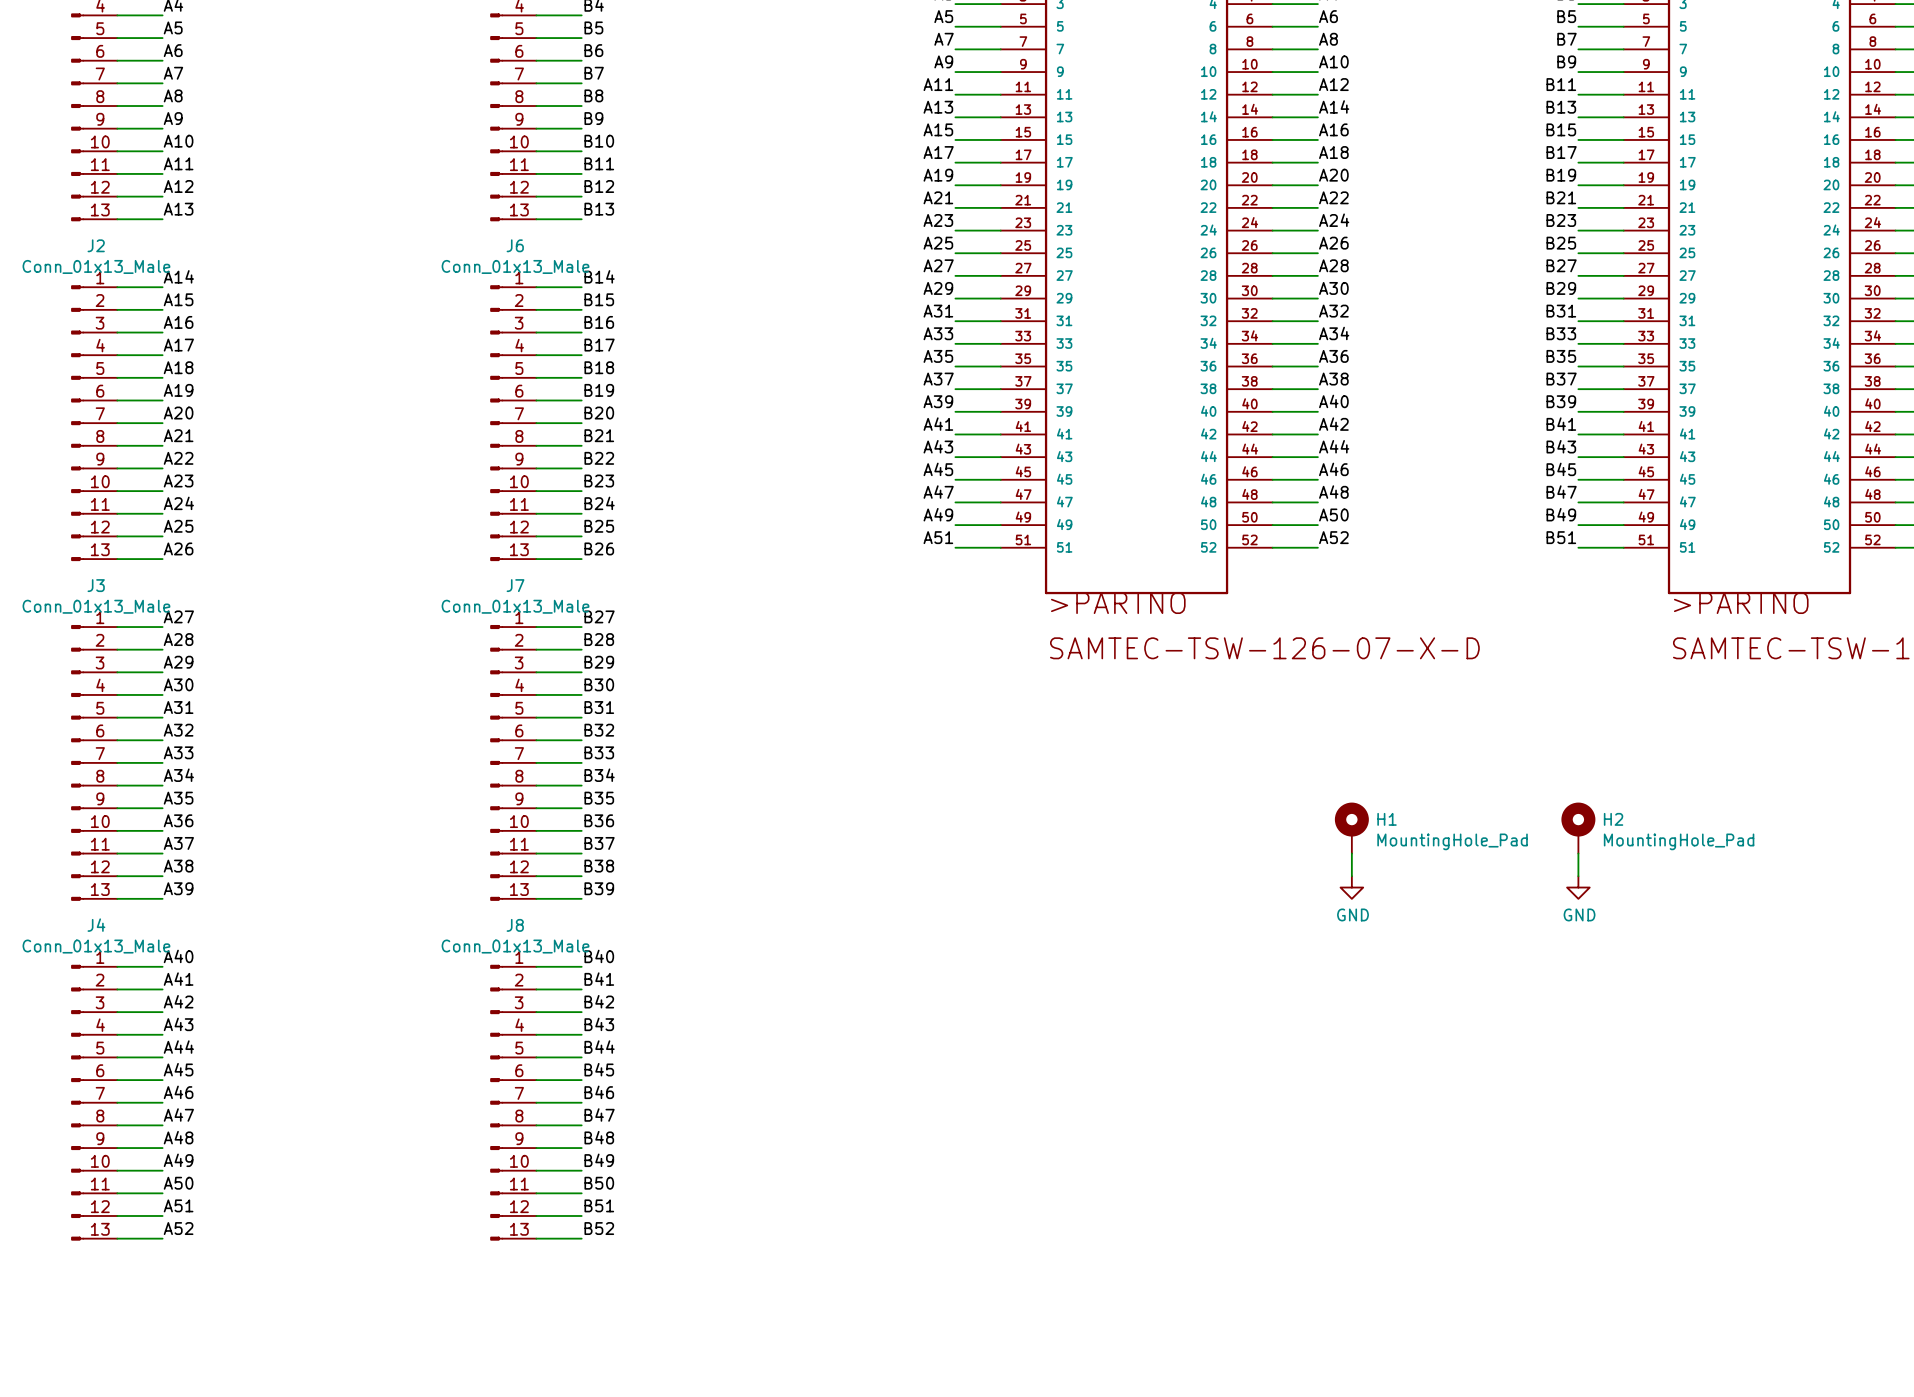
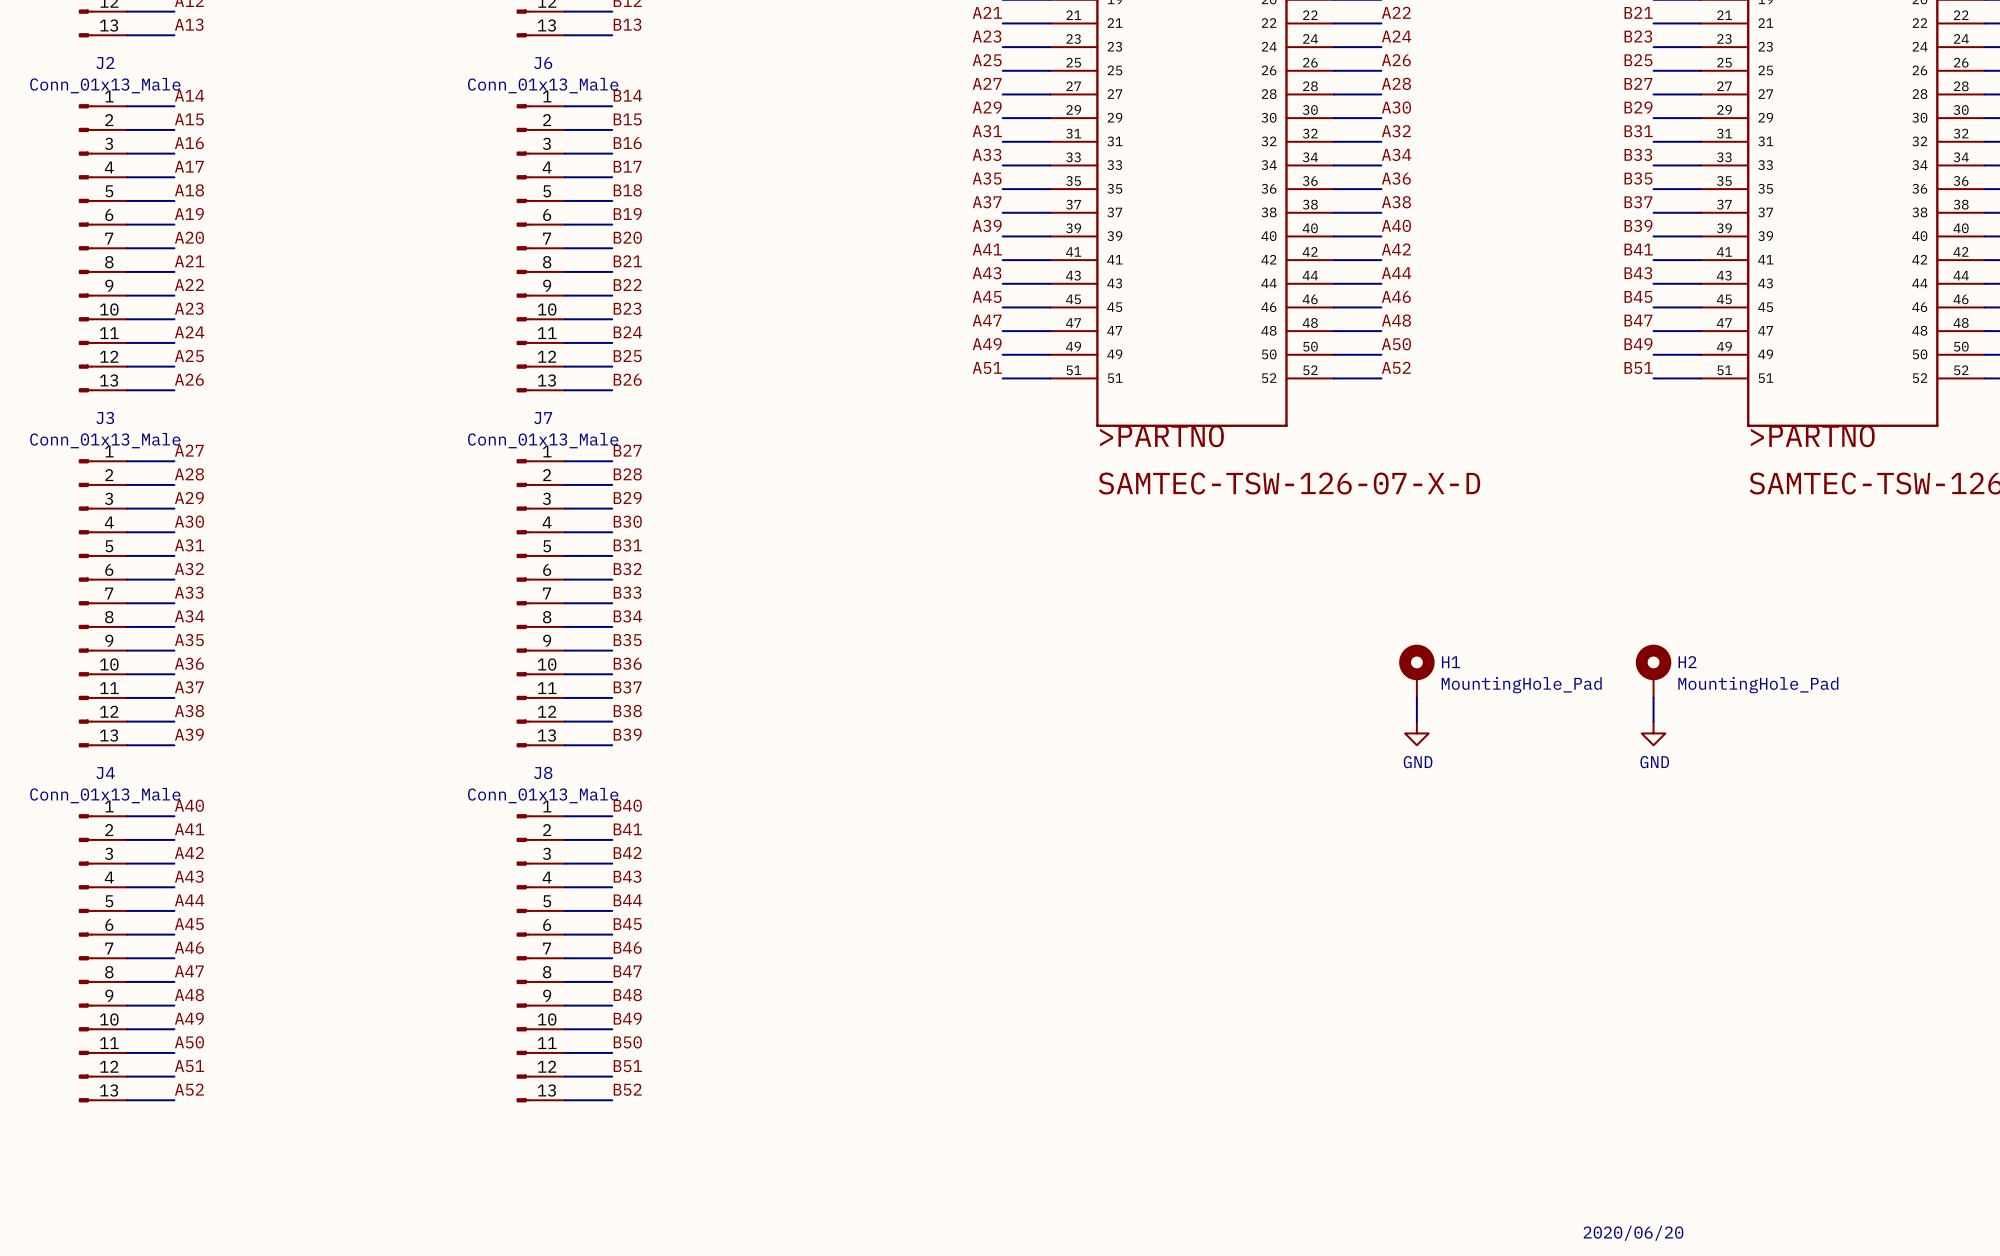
text: none -> 2020/06/20 (1633, 1233)

